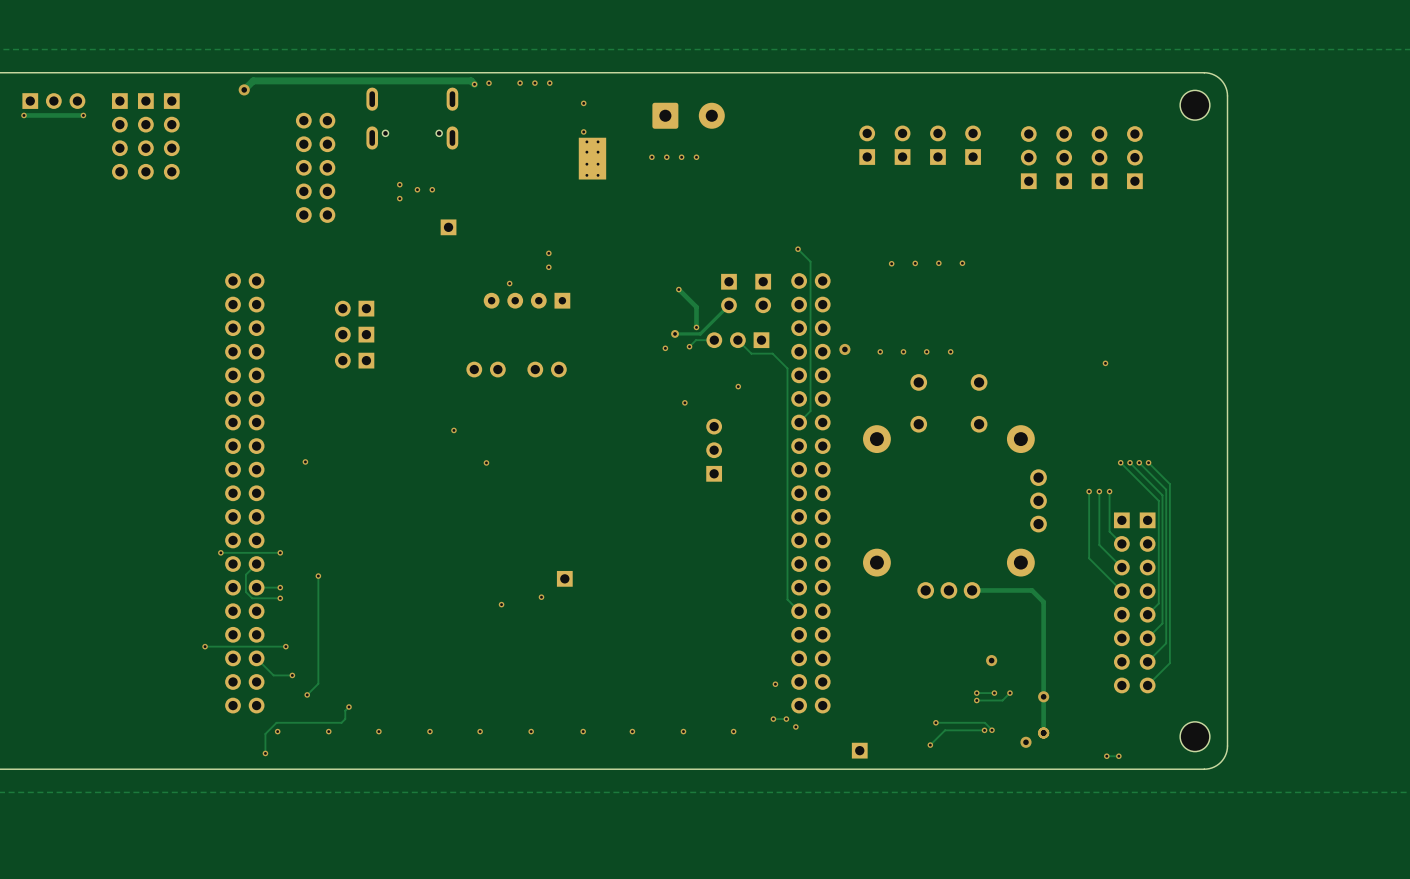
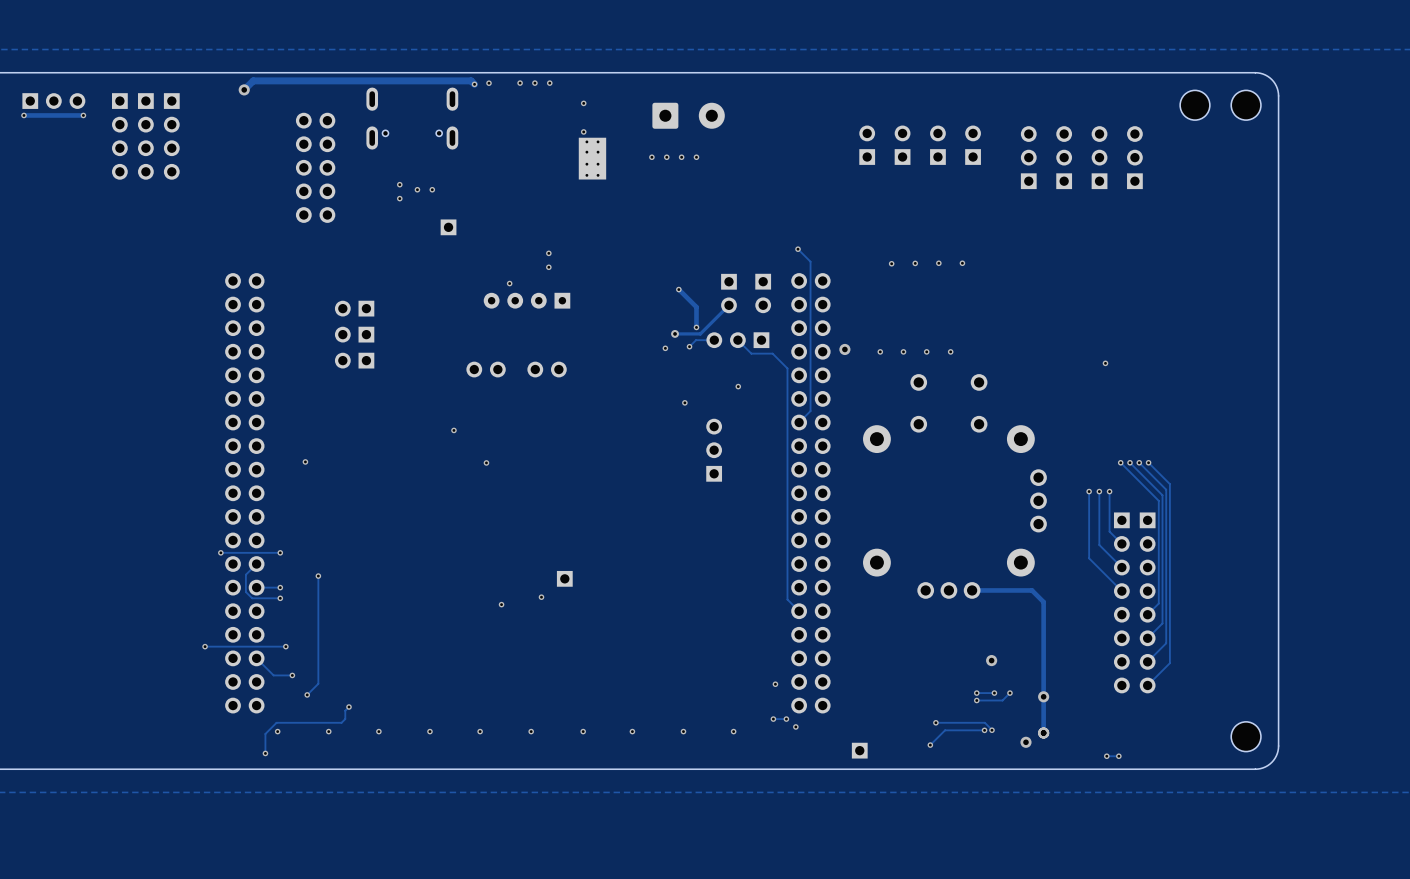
board edge: (1204, 72) (1211, 74) (1220, 79) (1225, 85) (1227, 95) (1227, 746) (1226, 753) (1220, 762) (1214, 766) (1204, 769) -> (1204, 72) (1263, 74) (1273, 81) (1278, 95) (1278, 748) (1271, 762) (1260, 768) (1204, 769)
part: none -> (1246, 105)
part position: (1195, 736) -> (1246, 736)

